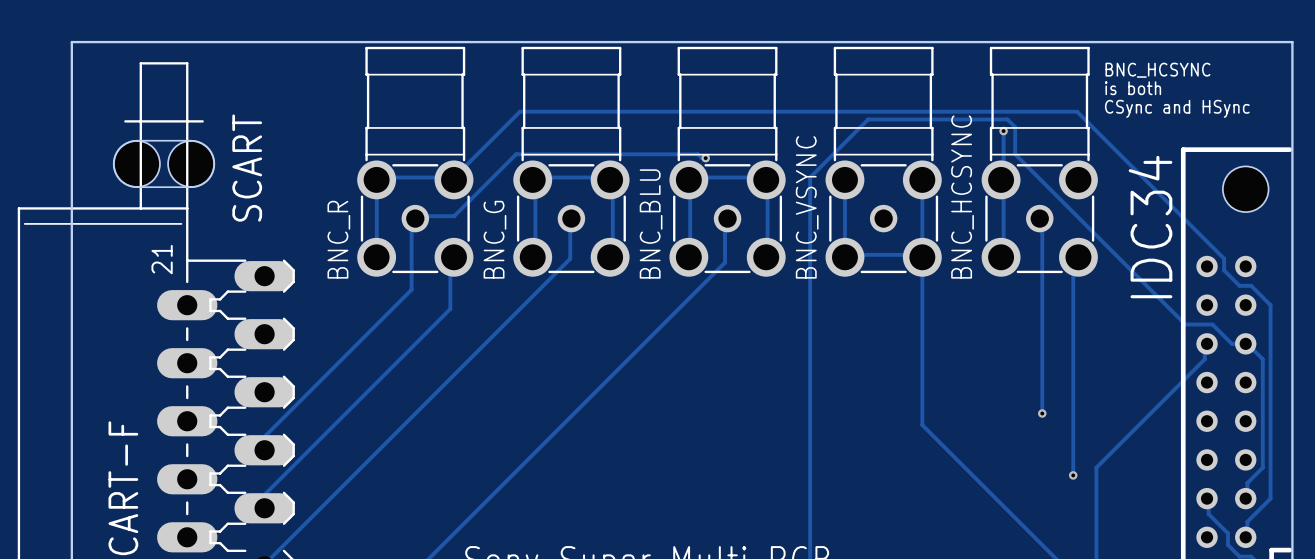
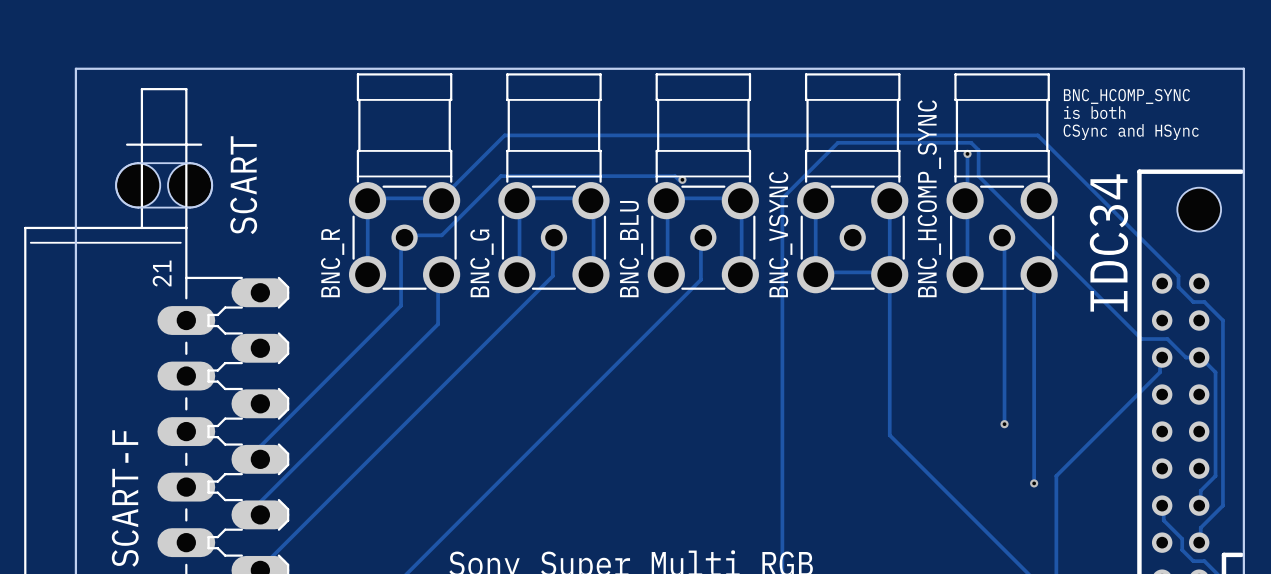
text: BNC_HCSYNC (1157, 70) -> BNC_HCOMP_SYNC (1126, 96)
BNC_HCSYNC name: BNC_HCSYNC (962, 197) -> BNC_HCOMP_SYNC (929, 198)

